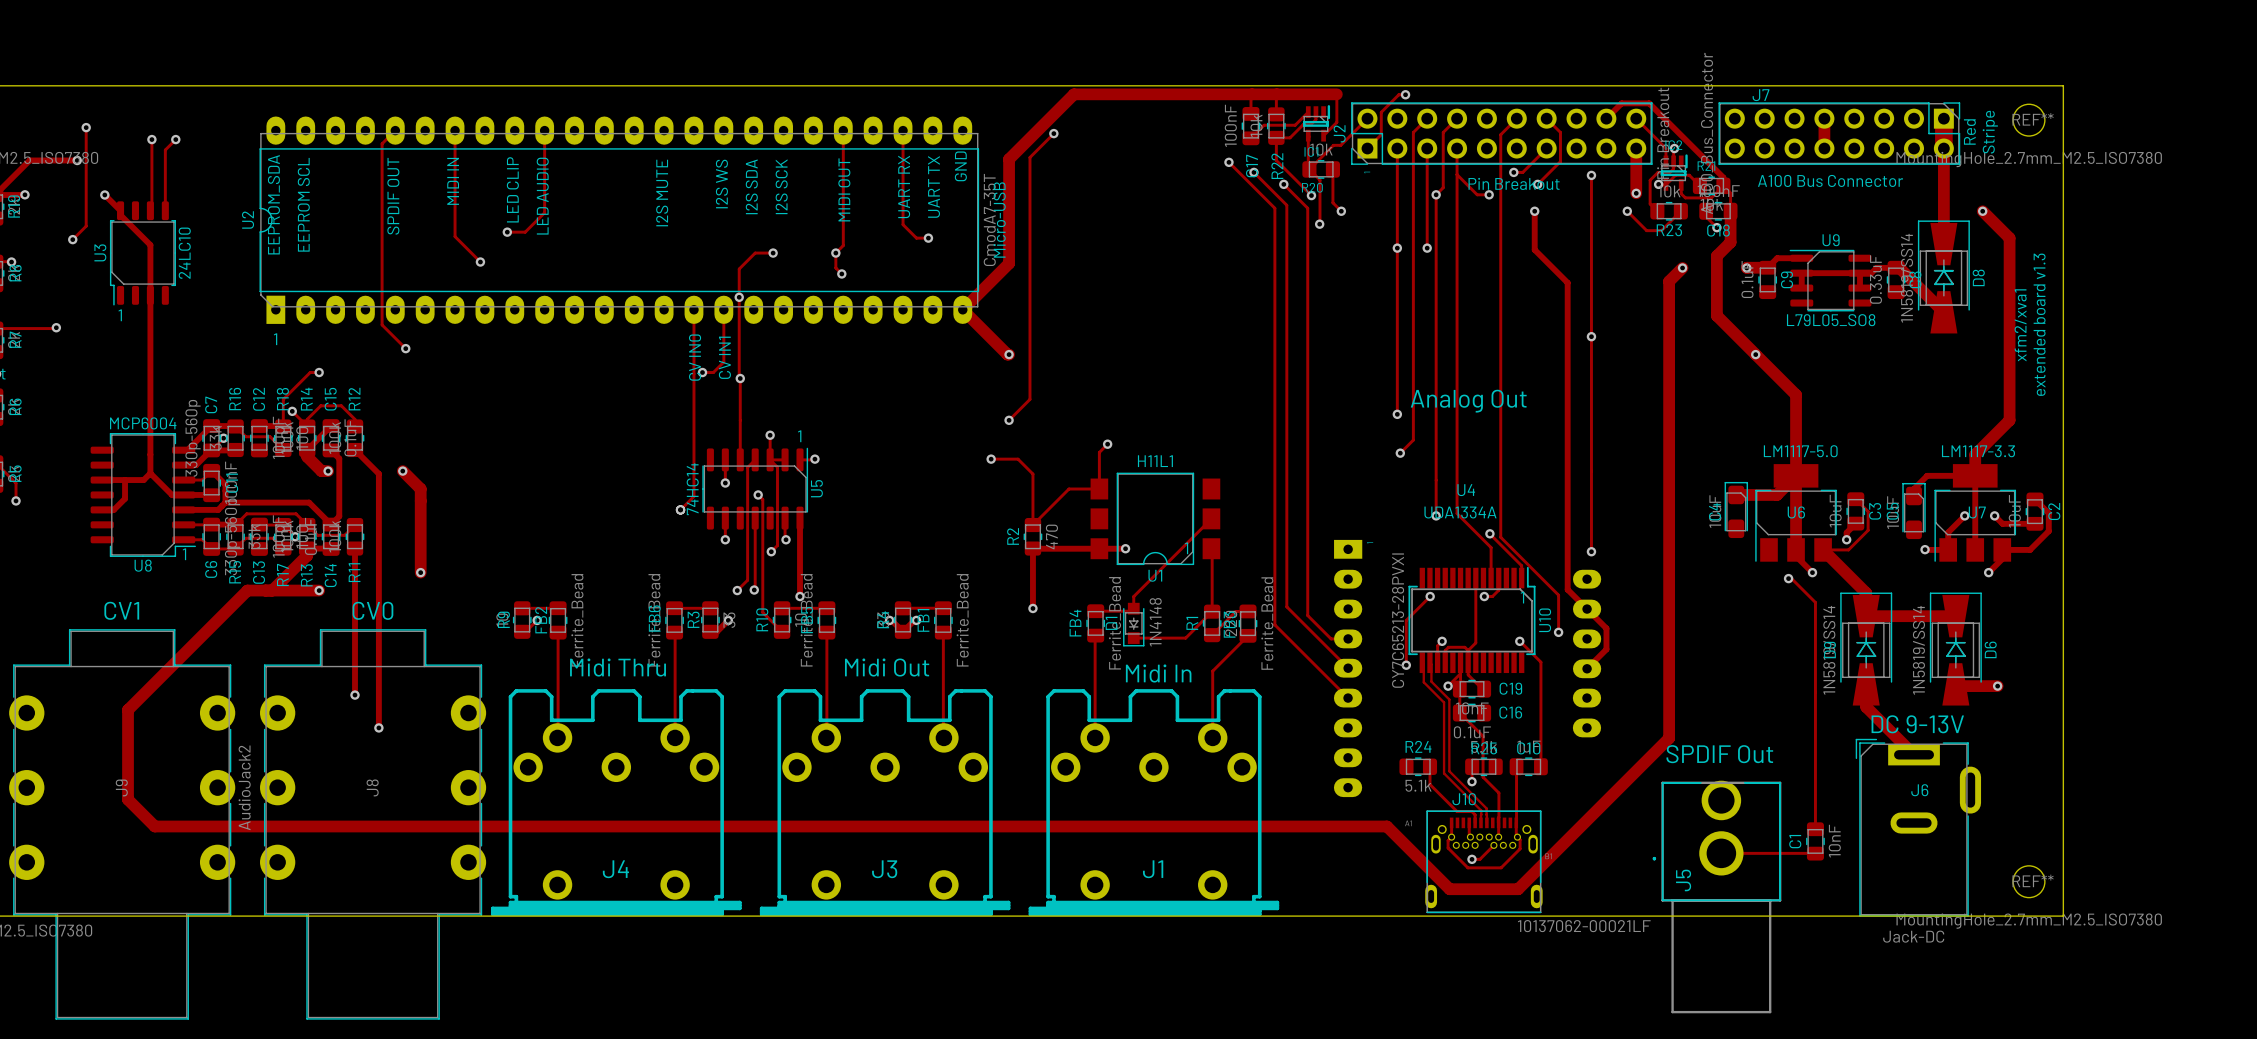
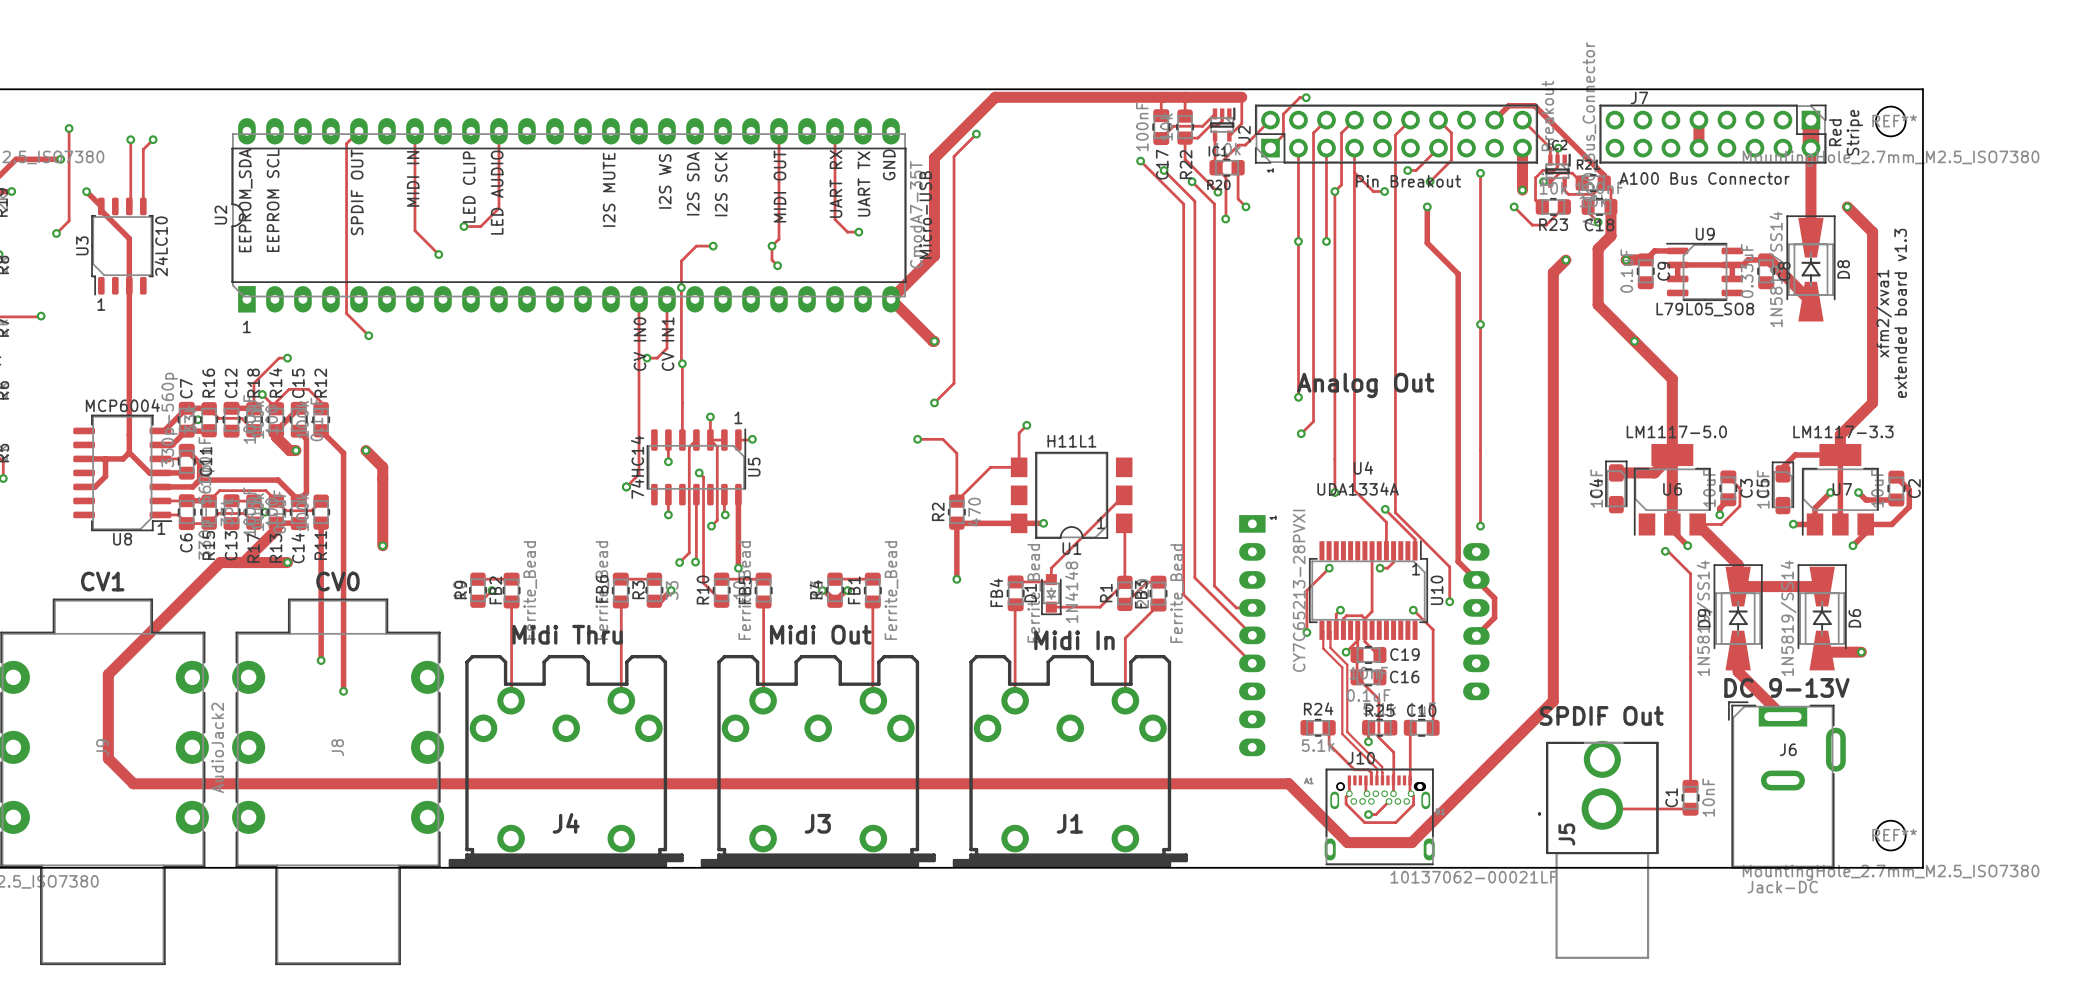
J10 footprint: [1425, 810, 1543, 914] -> [1324, 768, 1435, 866]

